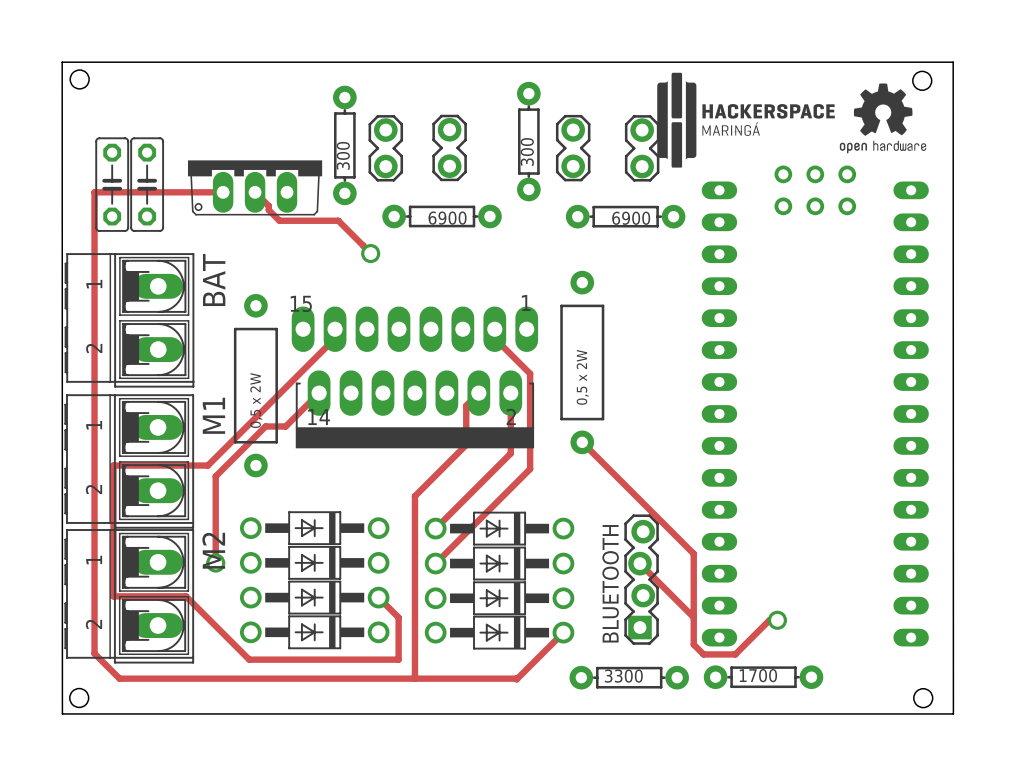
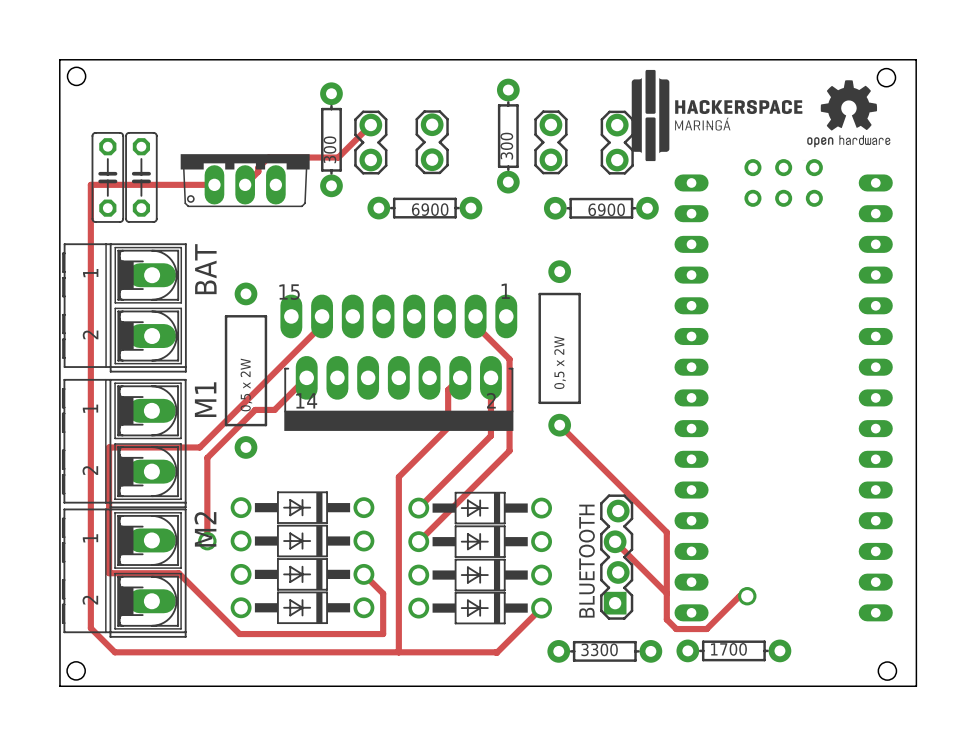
track: (255, 192) (279, 220) (338, 220) (370, 253) -> (245, 184) (268, 157) (338, 157) (370, 125)
via: (370, 253) -> none

